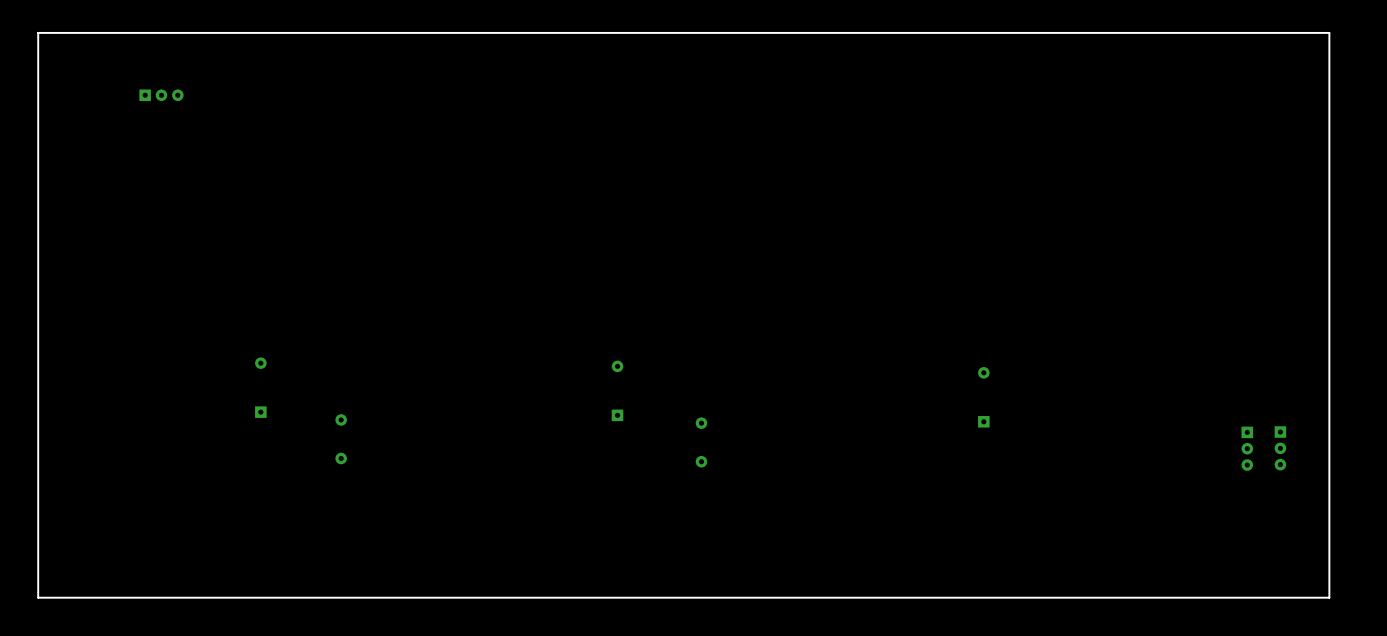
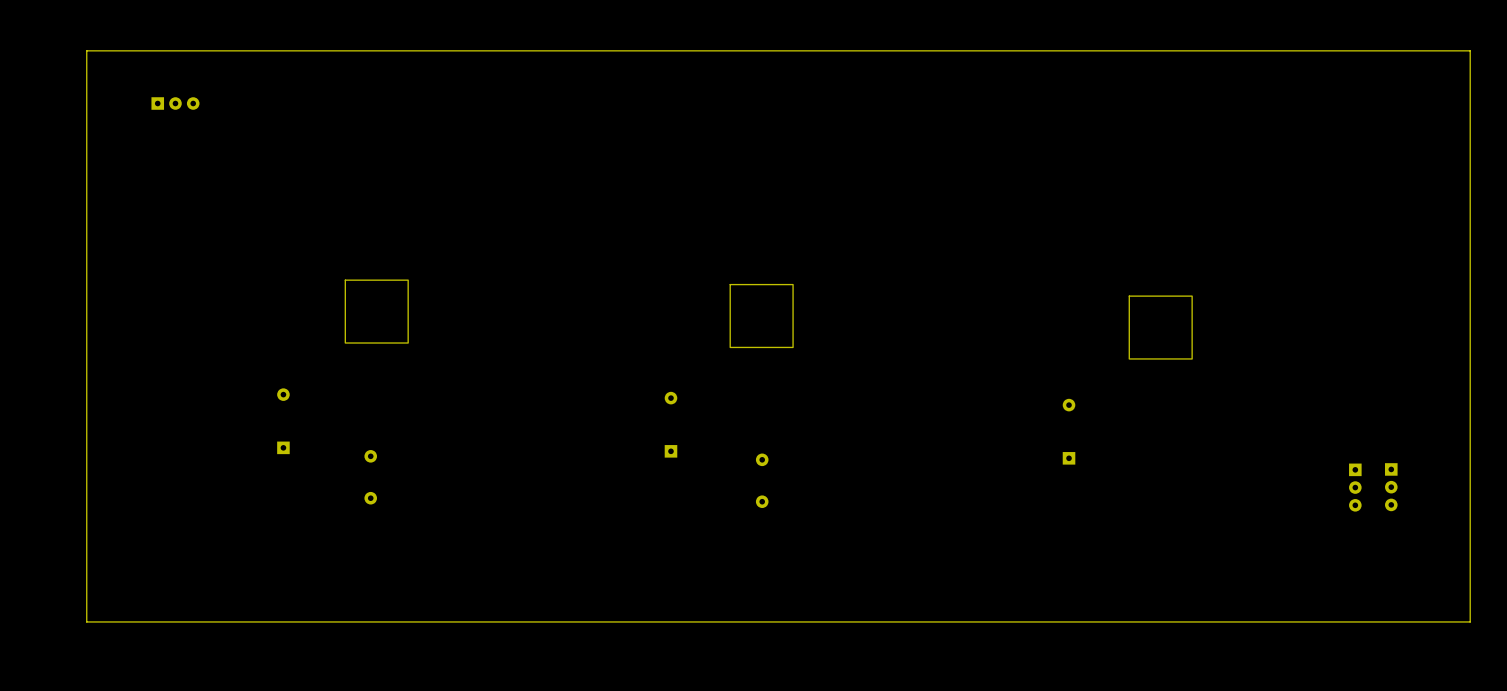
board edge: (1329, 32) (38, 32) (38, 597) (1329, 597) (1329, 32) -> (1470, 50) (1470, 621) (86, 621) (86, 50) (1470, 50)
part: none -> (376, 311)
part: none -> (761, 316)
part: none -> (1160, 327)

